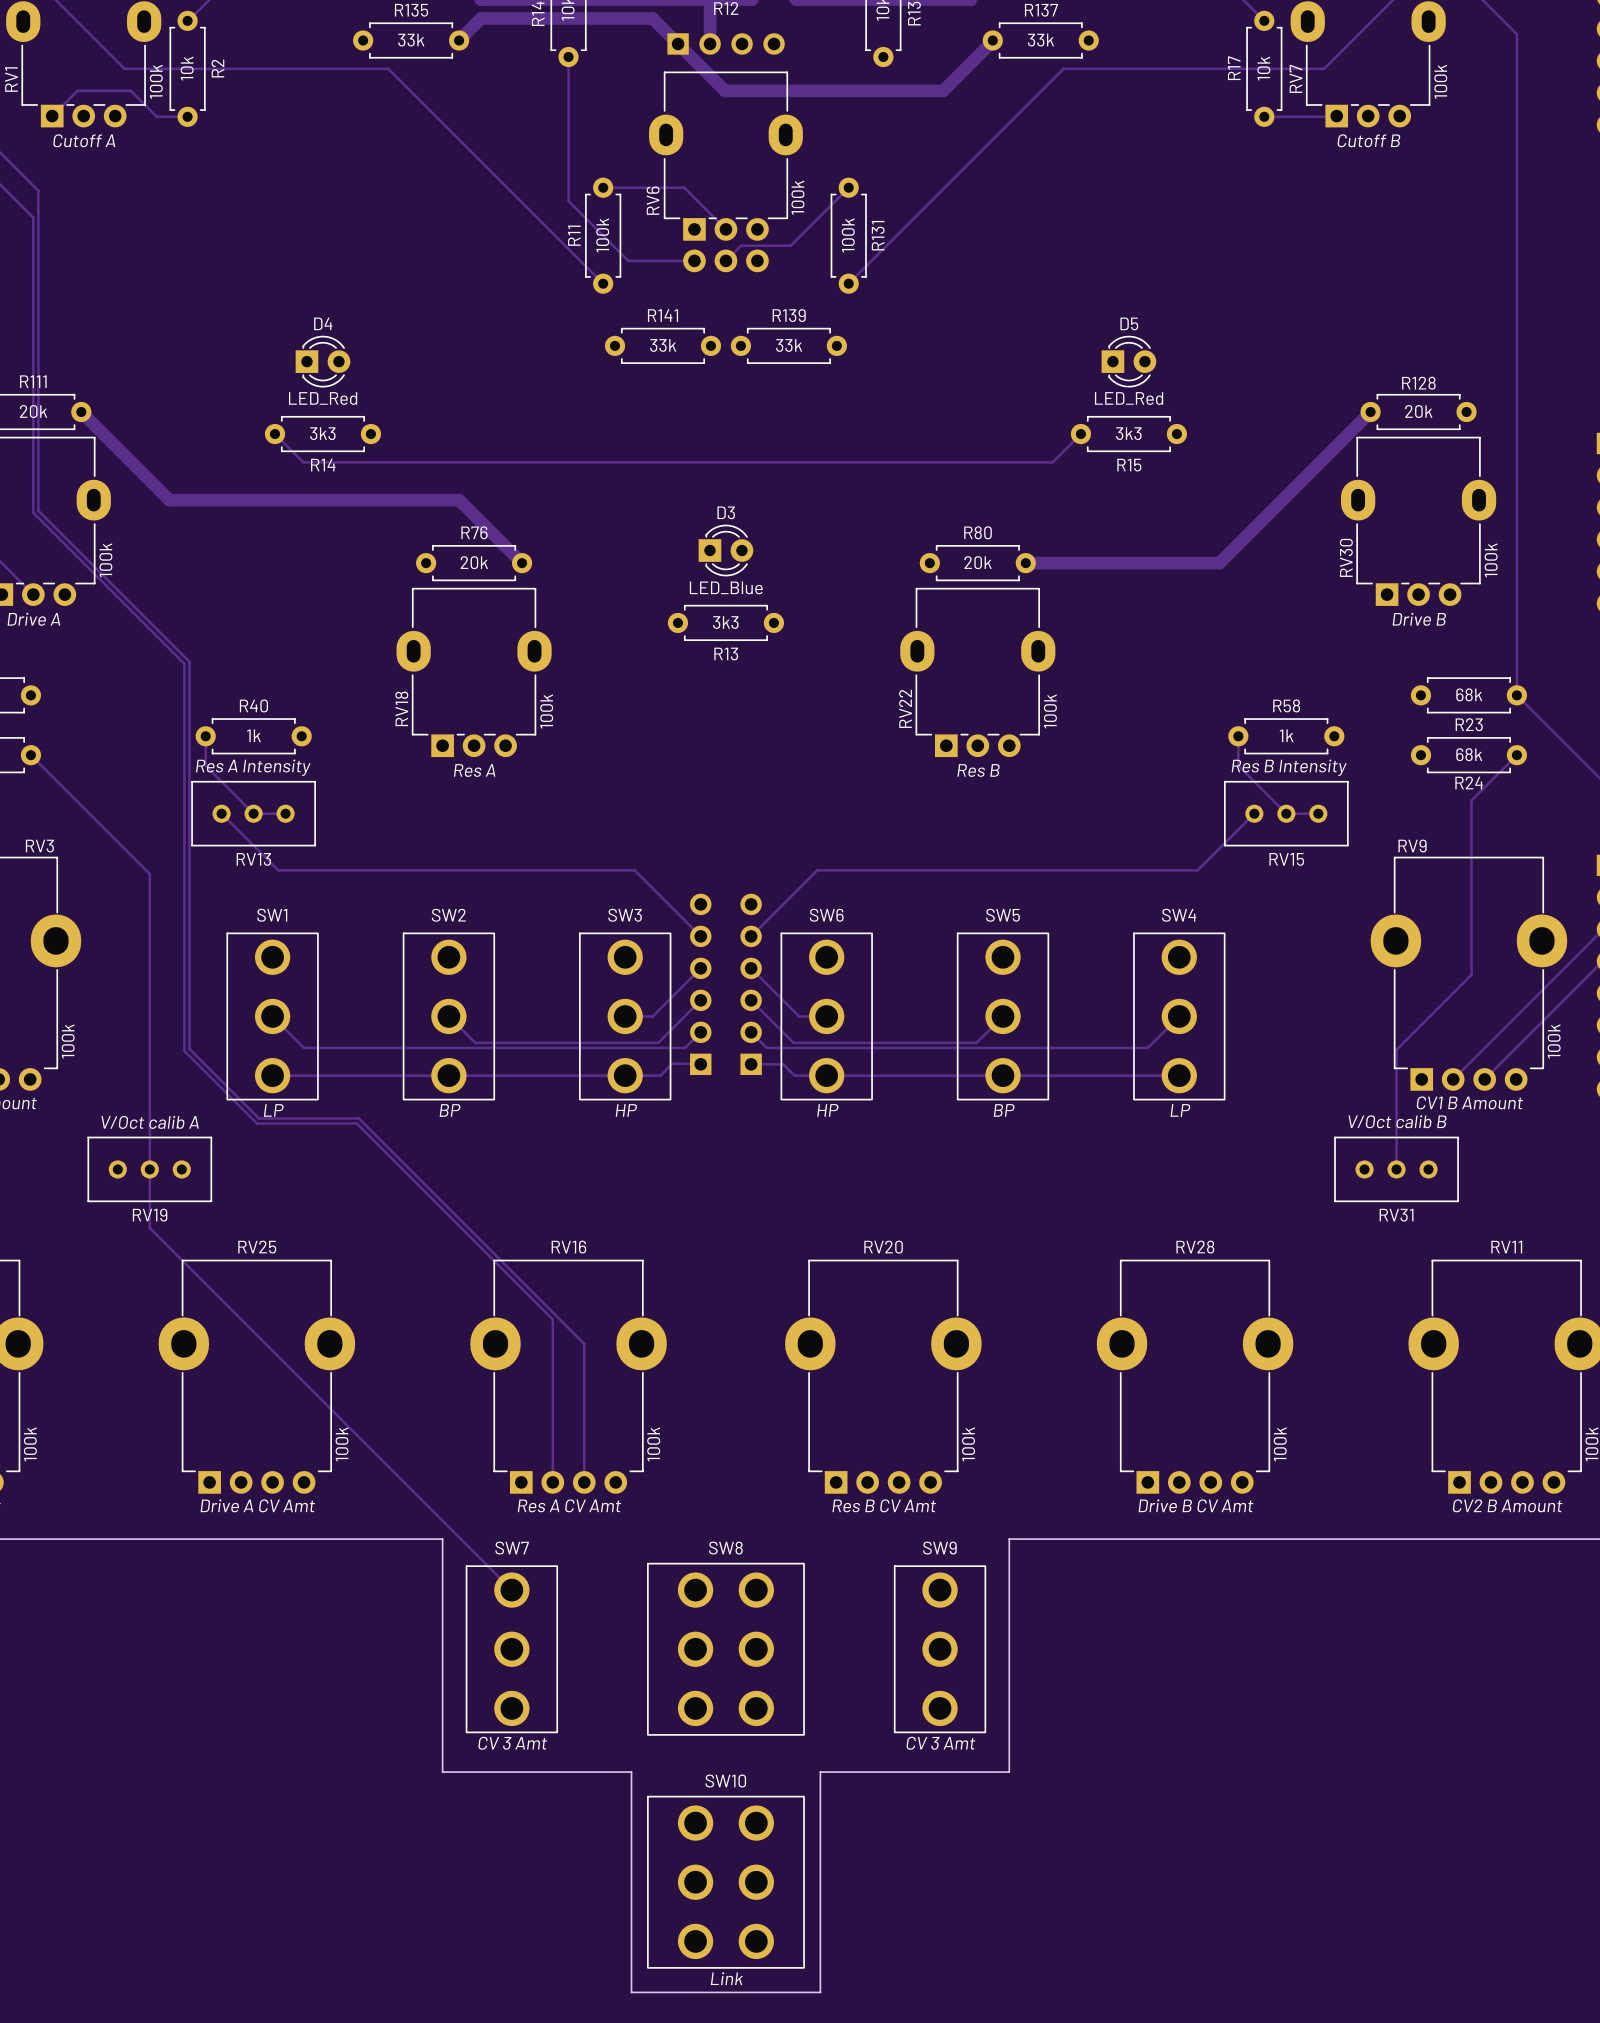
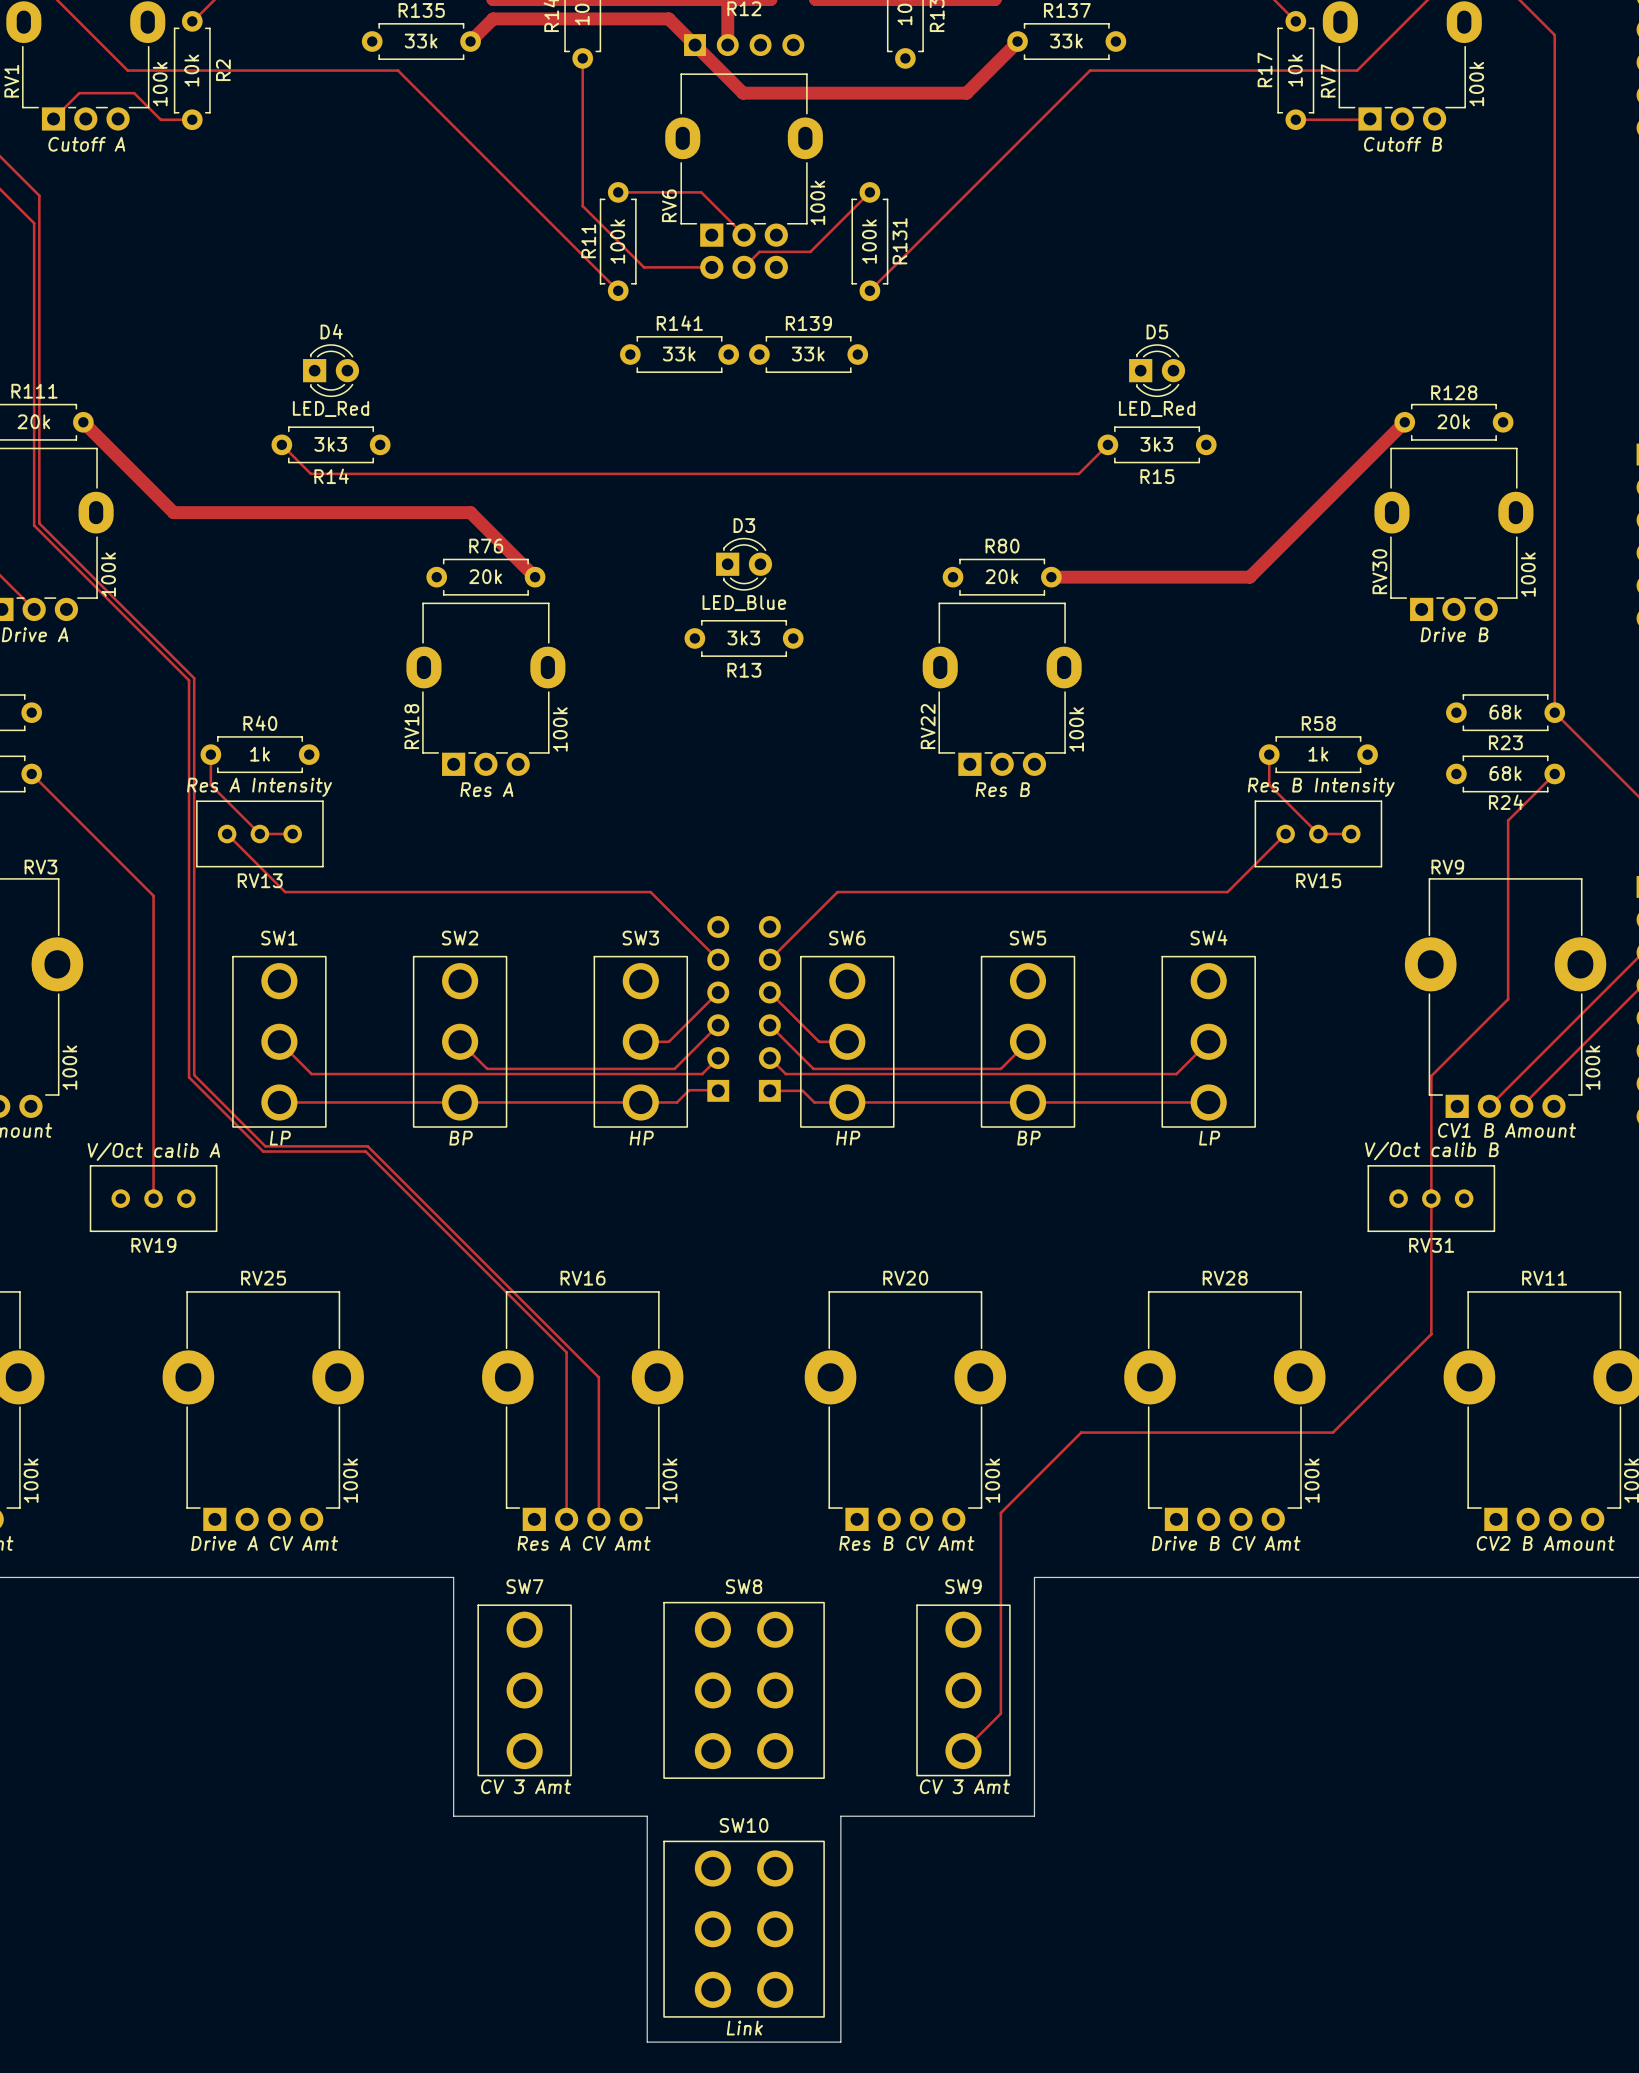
track: (149, 1169) (149, 1228) (511, 1590) -> none
track: none -> (1431, 1198) (1431, 1334) (1332, 1432) (1081, 1432) (1000, 1512) (1000, 1713) (963, 1751)

